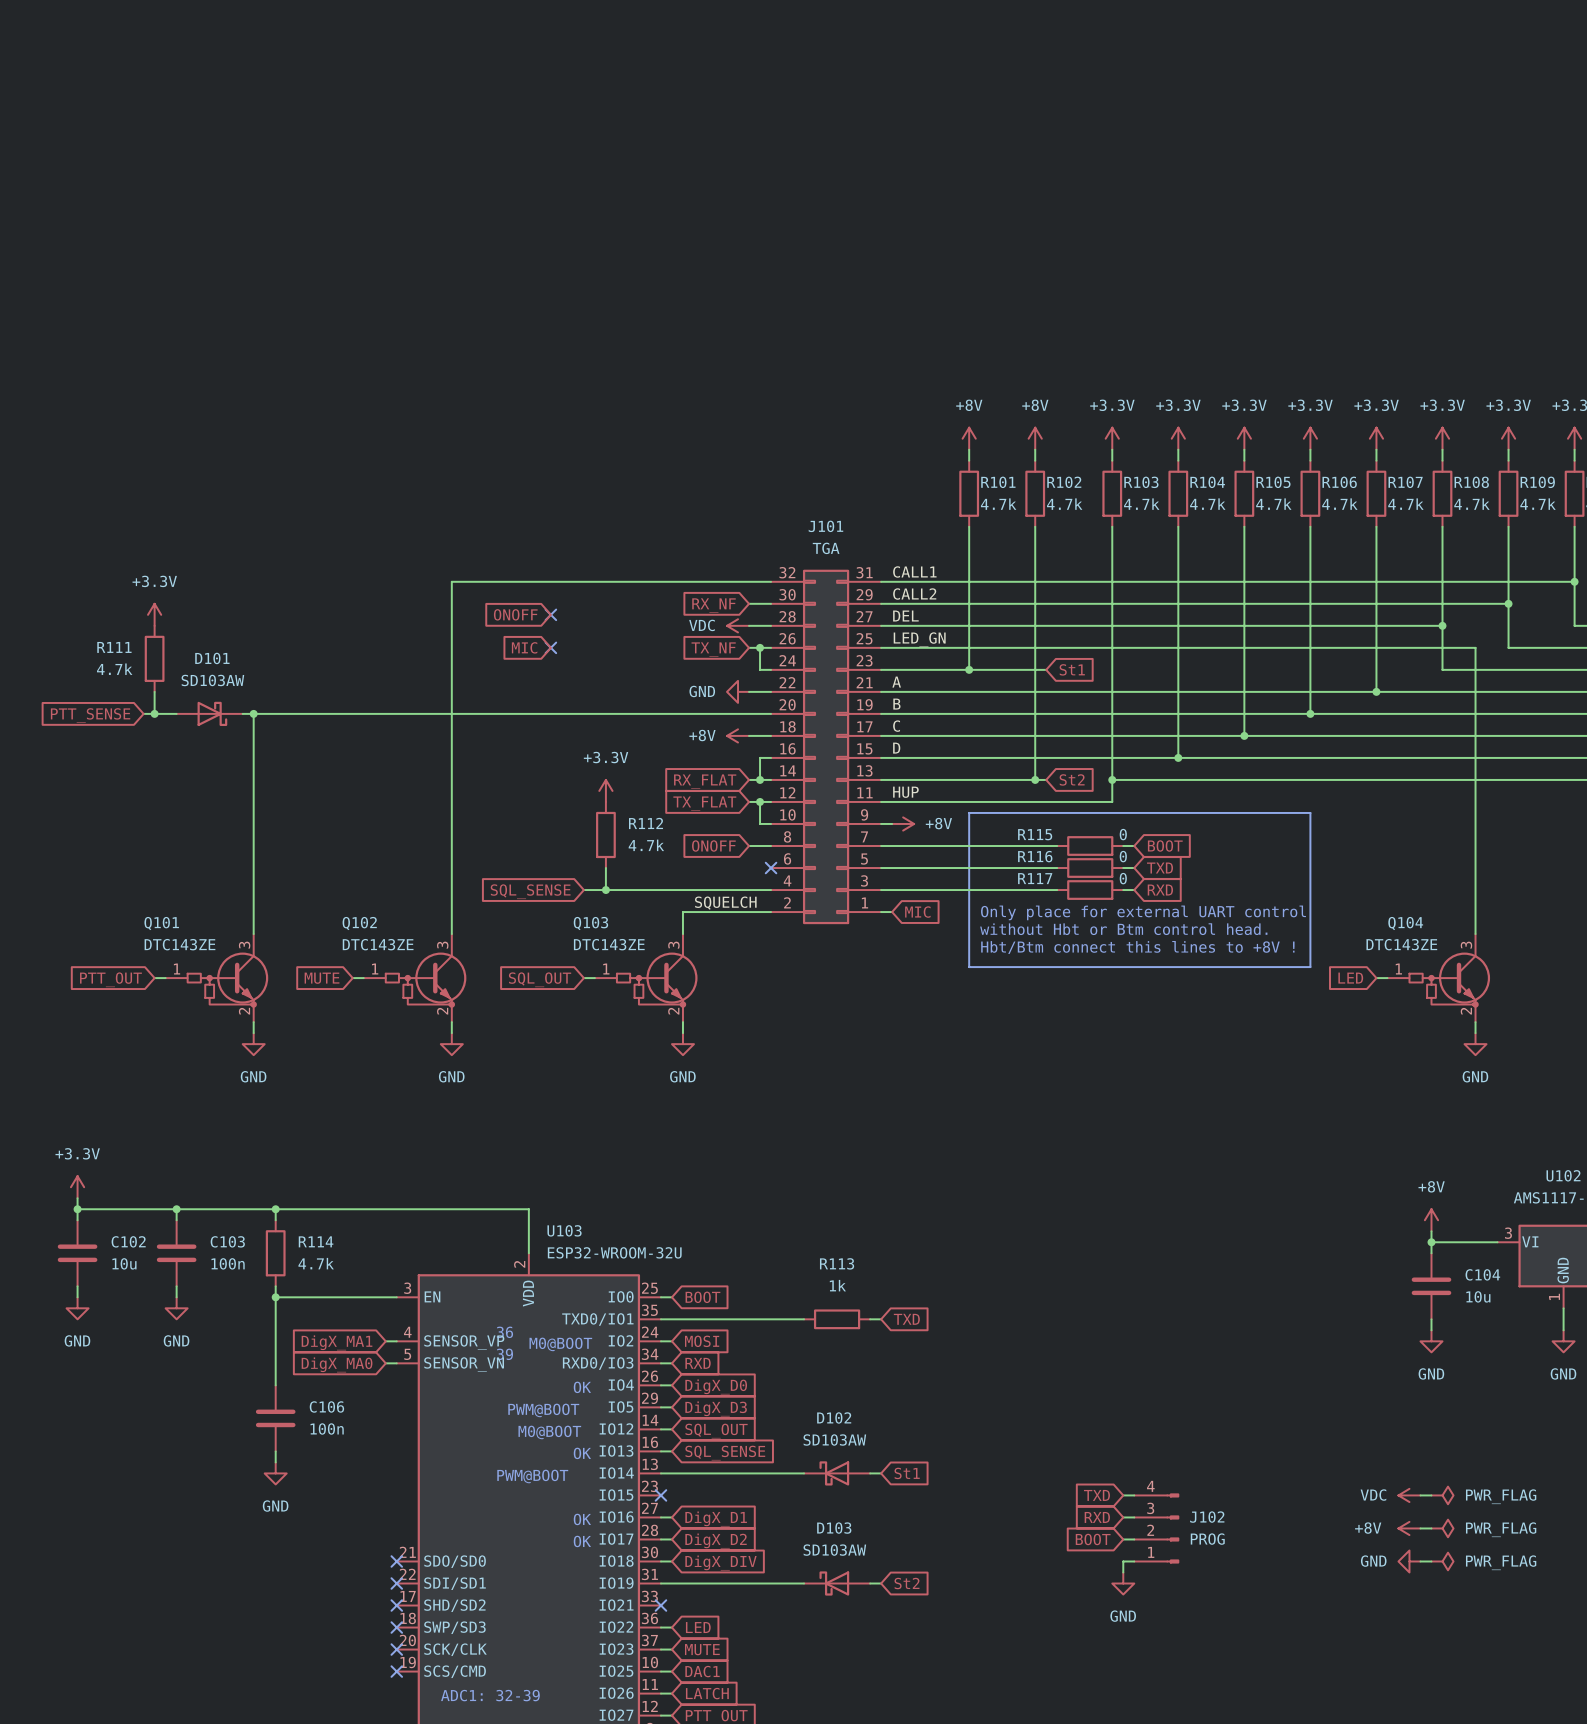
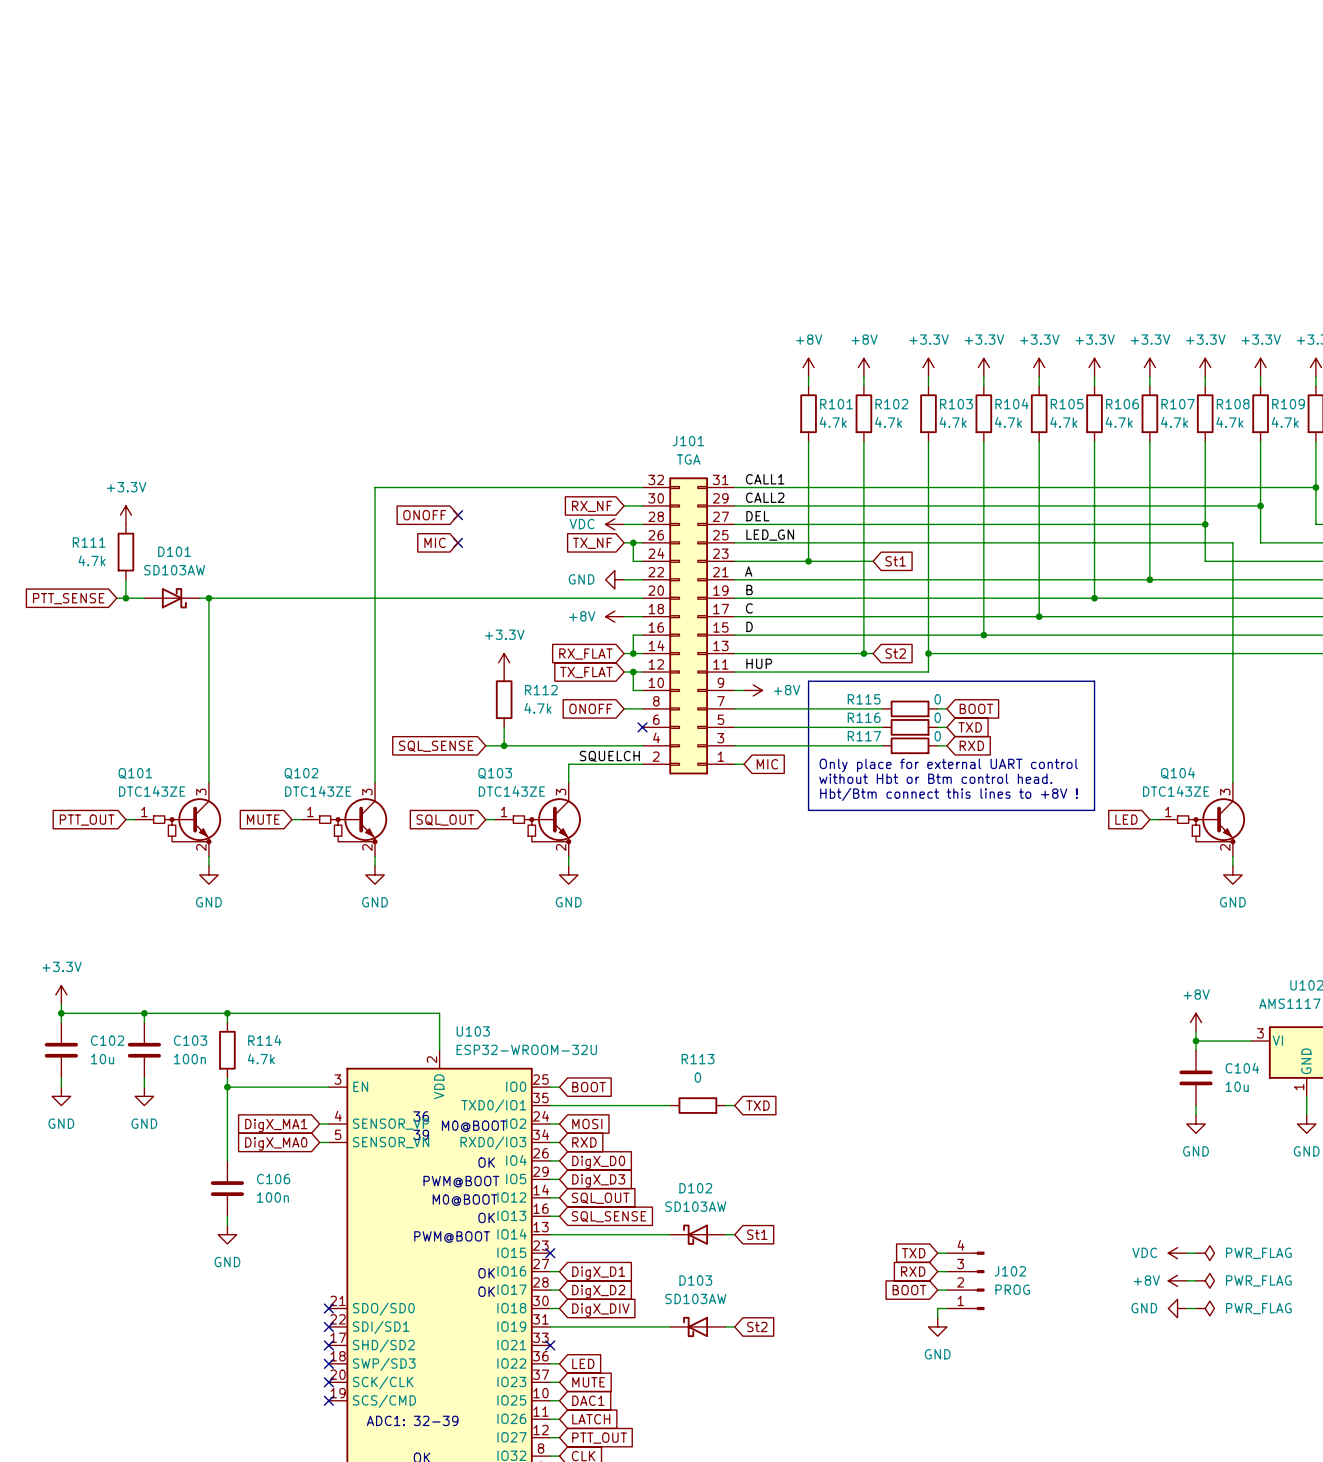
R113 value: 1k (837, 1285) -> 0 (697, 1077)

